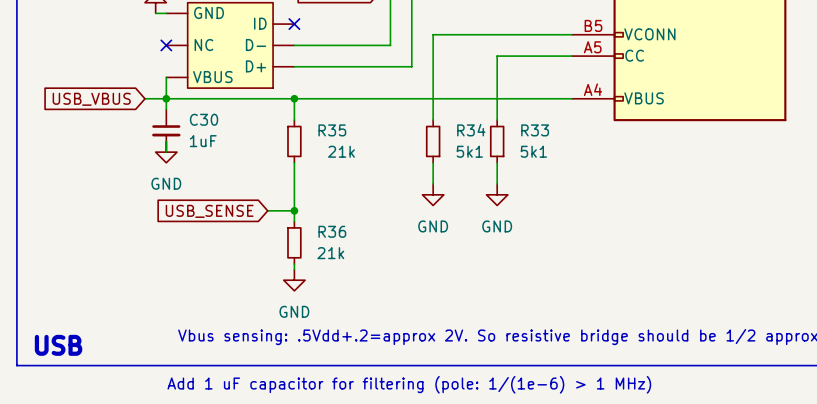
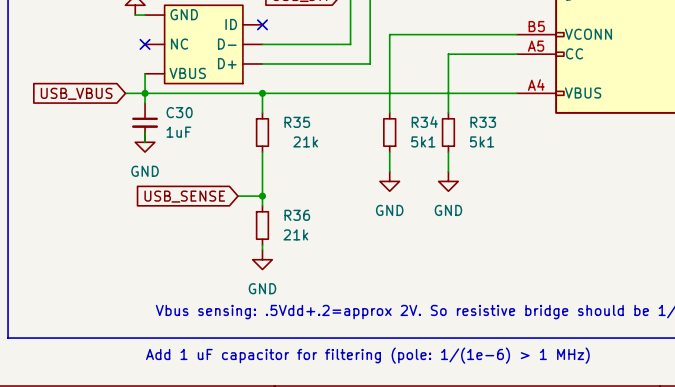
text: USB (58, 345) -> none

